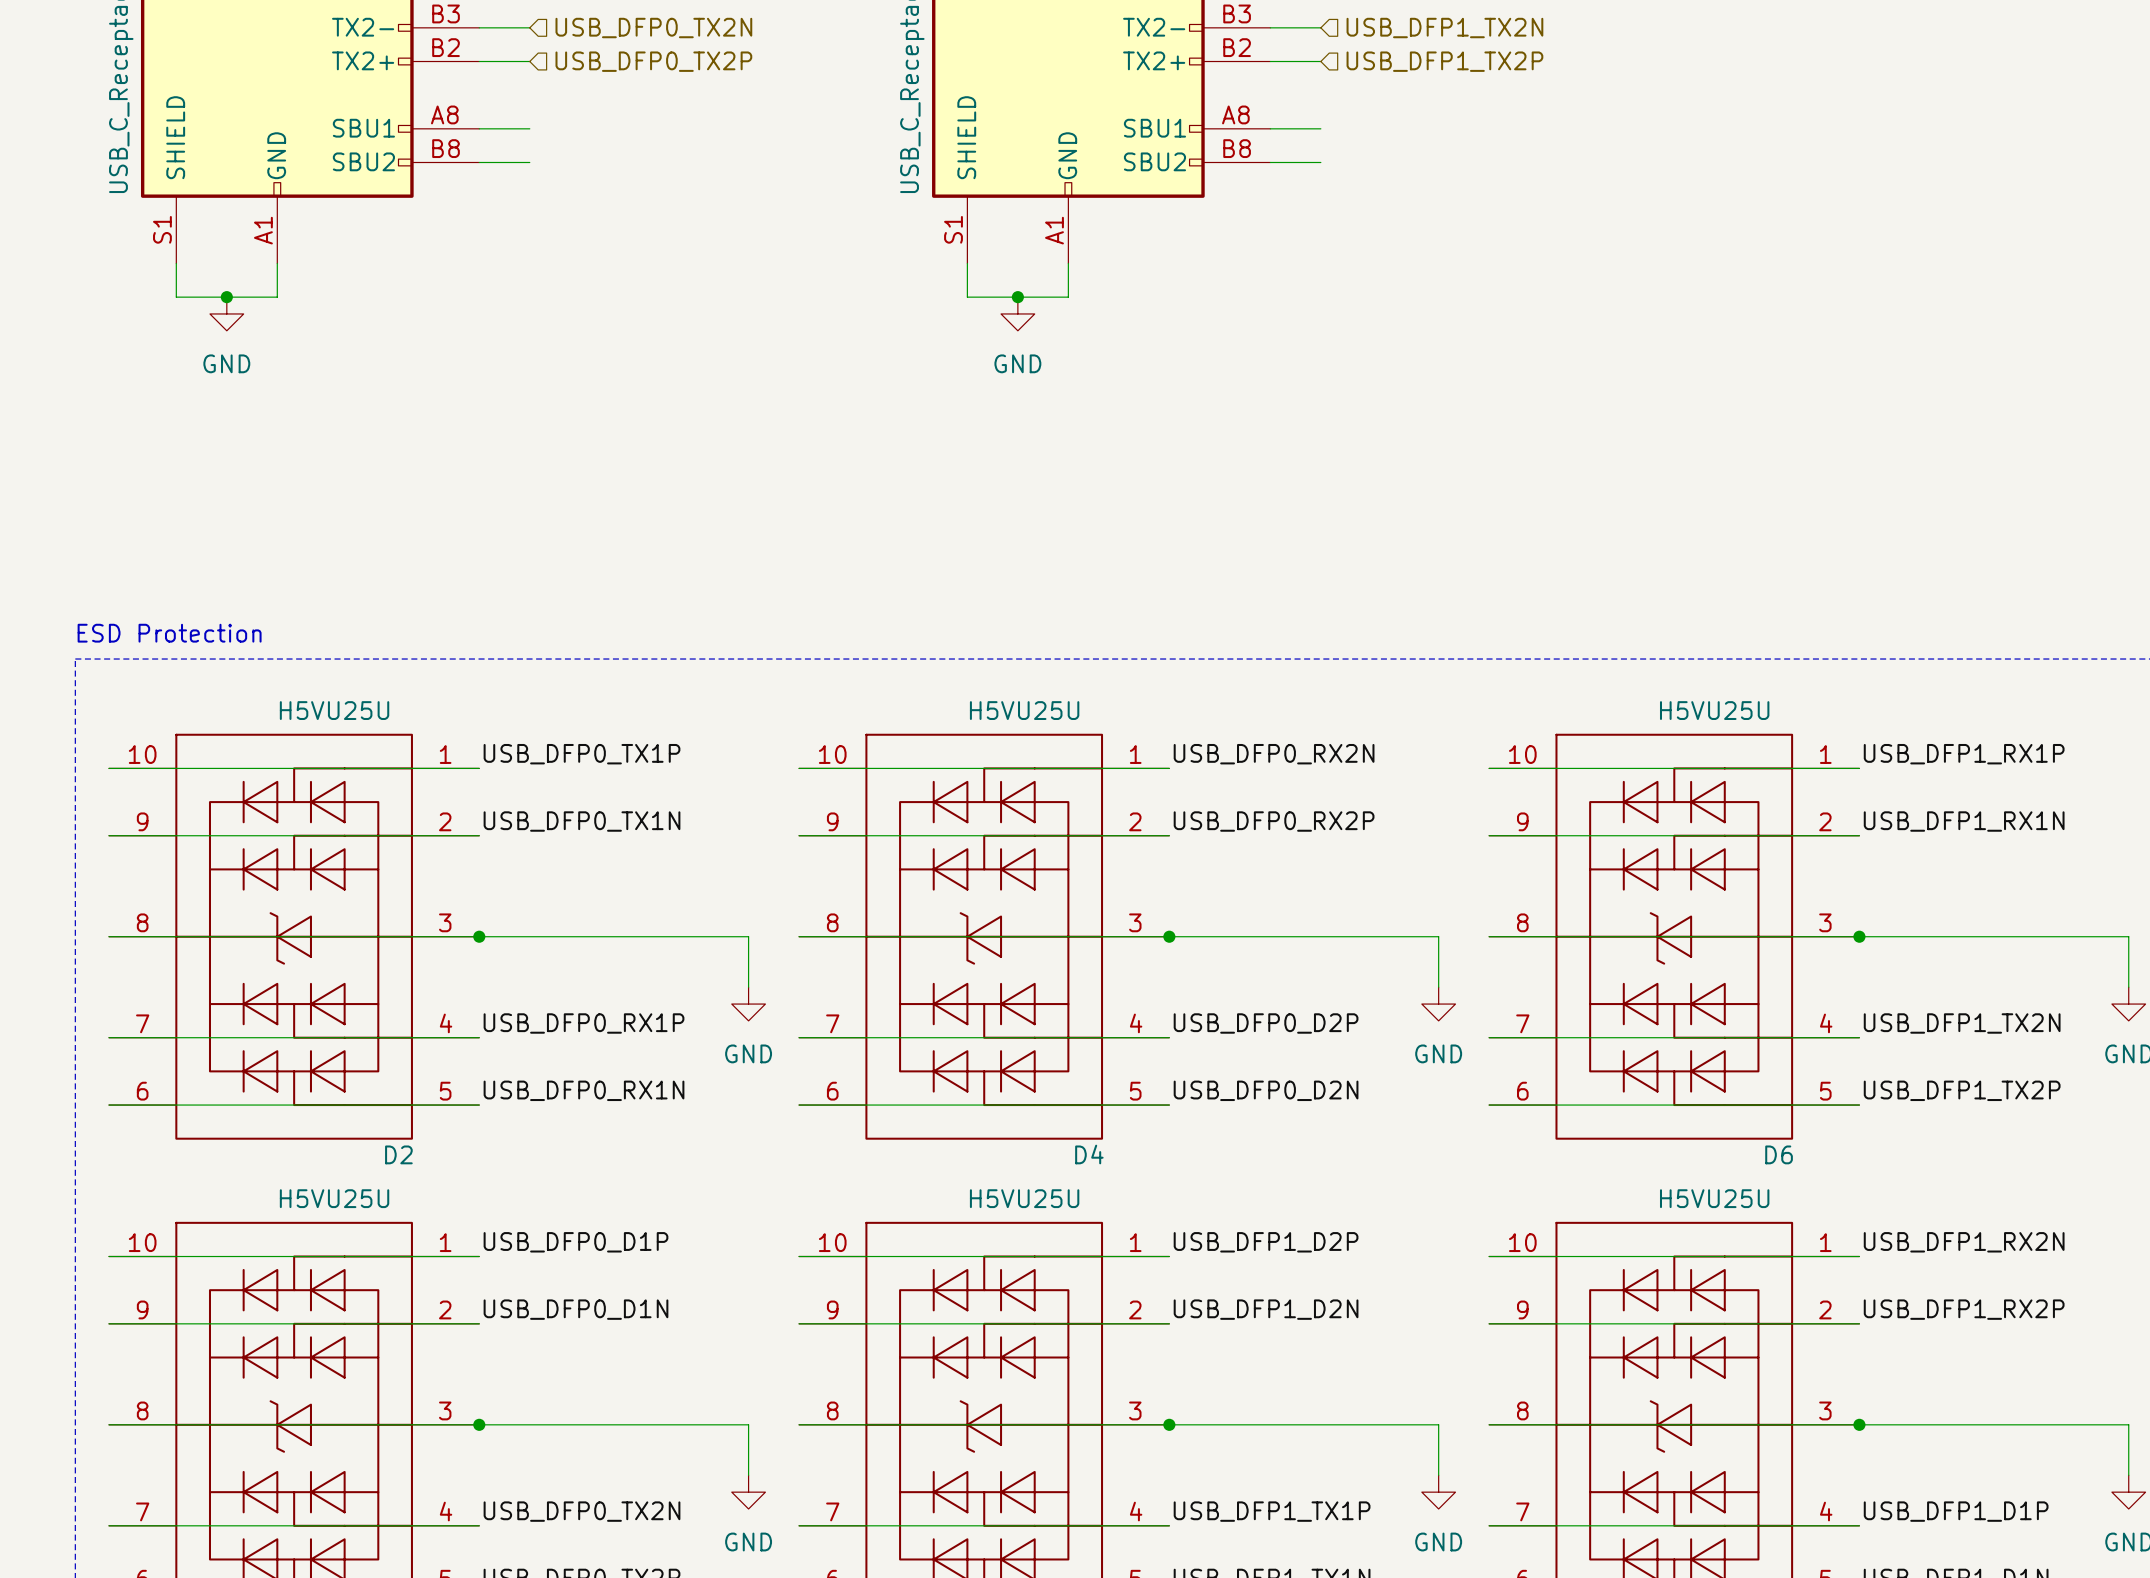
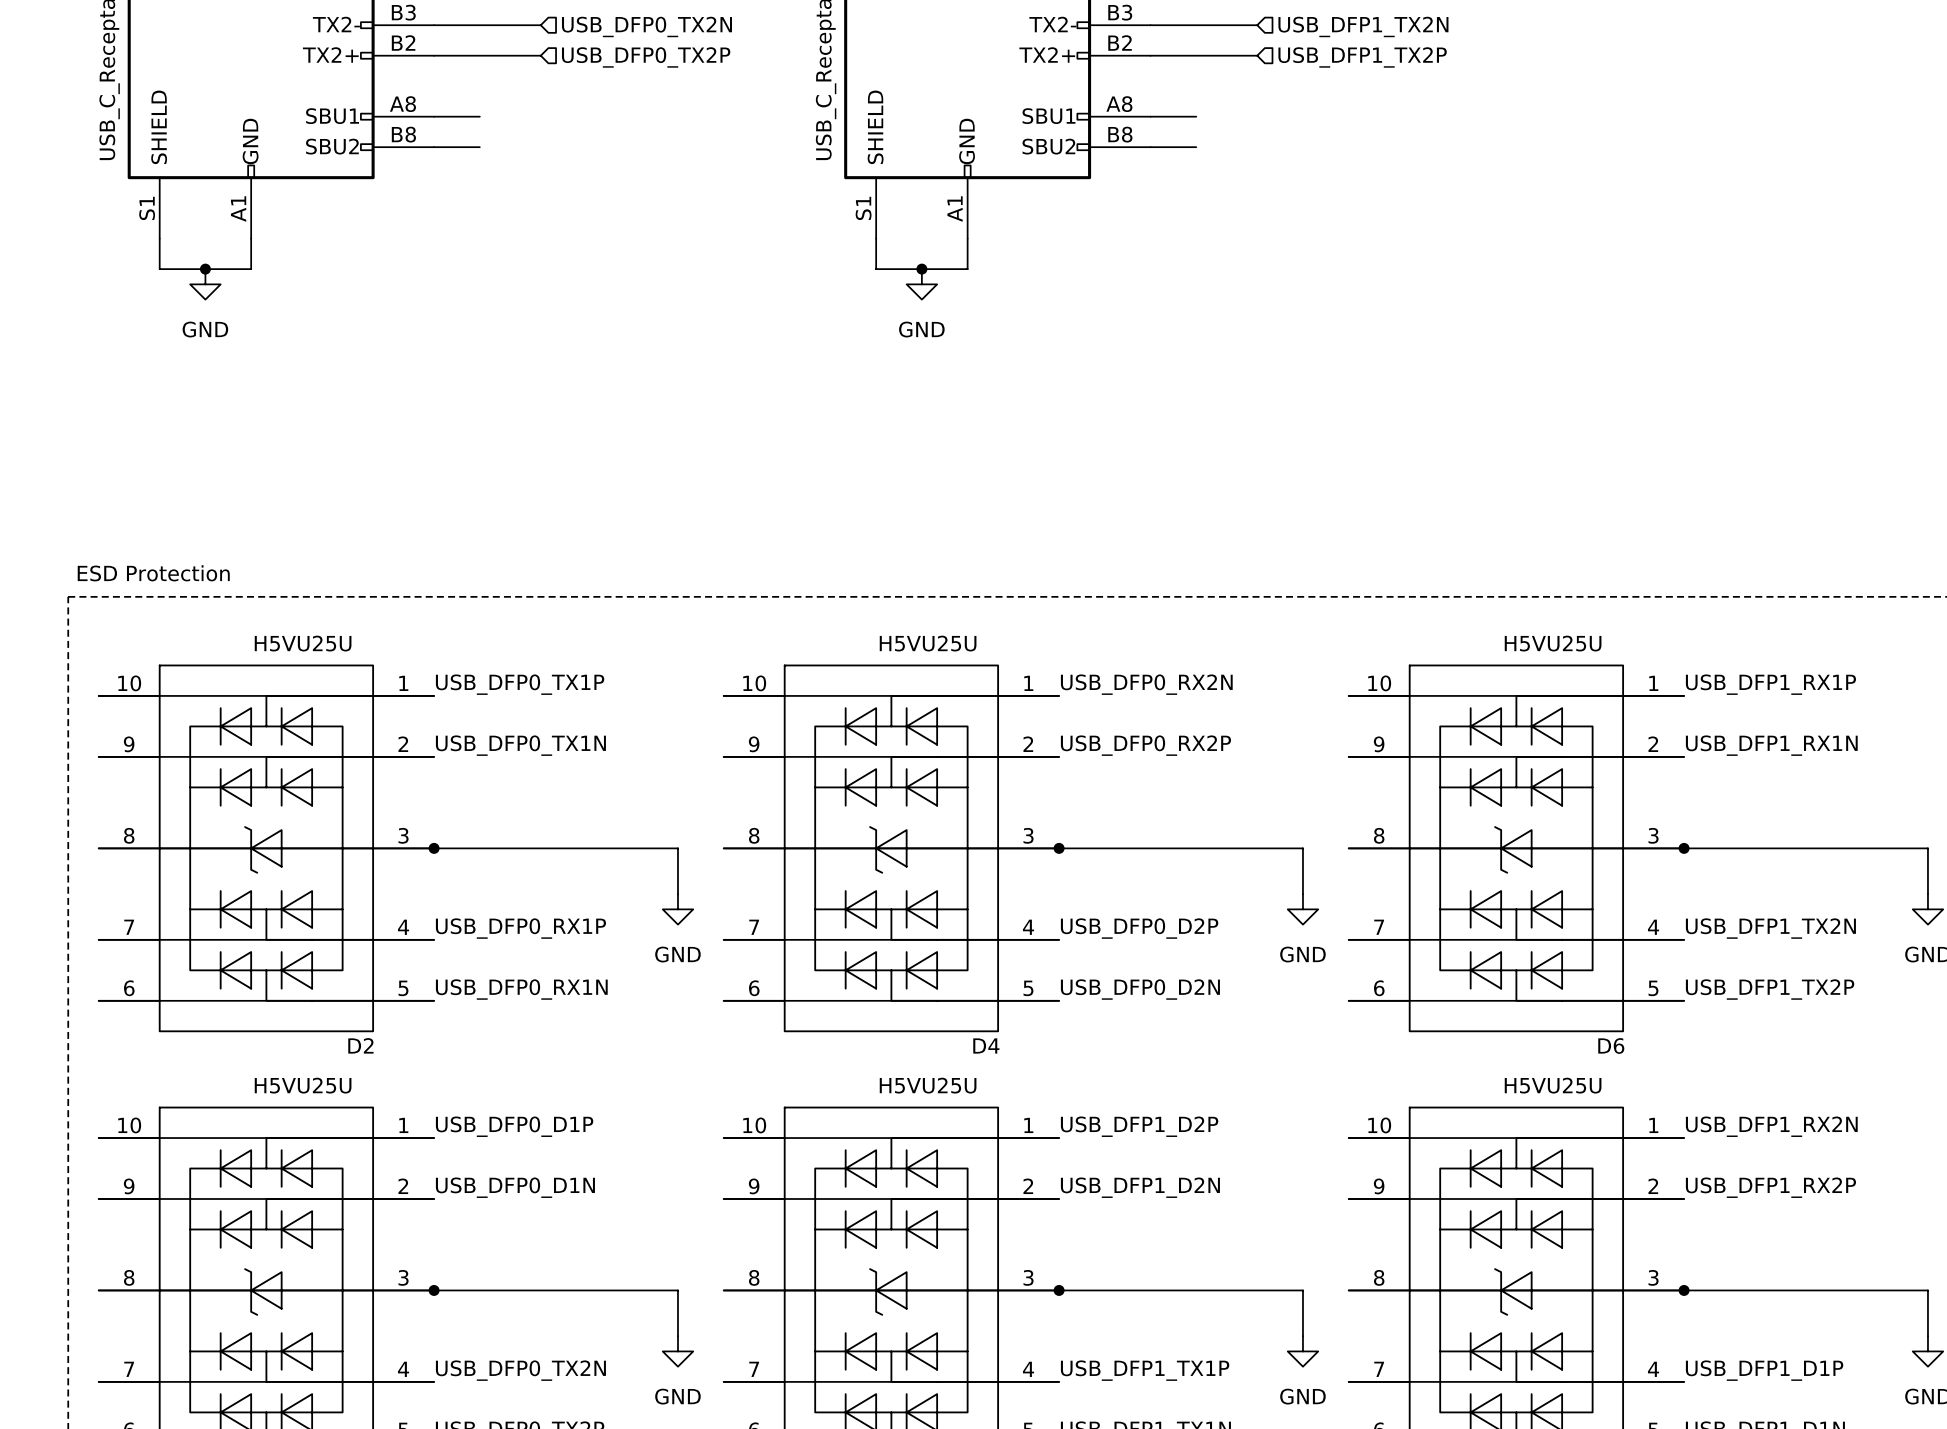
wire: none -> (479, 25) (540, 25)
wire: none -> (1196, 25) (1257, 25)
hierarchical label position: USB_DFP0_TX2N (653, 28) -> USB_DFP0_TX2N (646, 26)
hierarchical label position: USB_DFP1_TX2N (1444, 28) -> USB_DFP1_TX2N (1363, 26)
wire: none -> (479, 55) (540, 55)
hierarchical label position: USB_DFP0_TX2P (653, 61) -> USB_DFP0_TX2P (646, 57)
wire: none -> (1196, 55) (1257, 55)
hierarchical label position: USB_DFP1_TX2P (1444, 61) -> USB_DFP1_TX2P (1362, 57)

